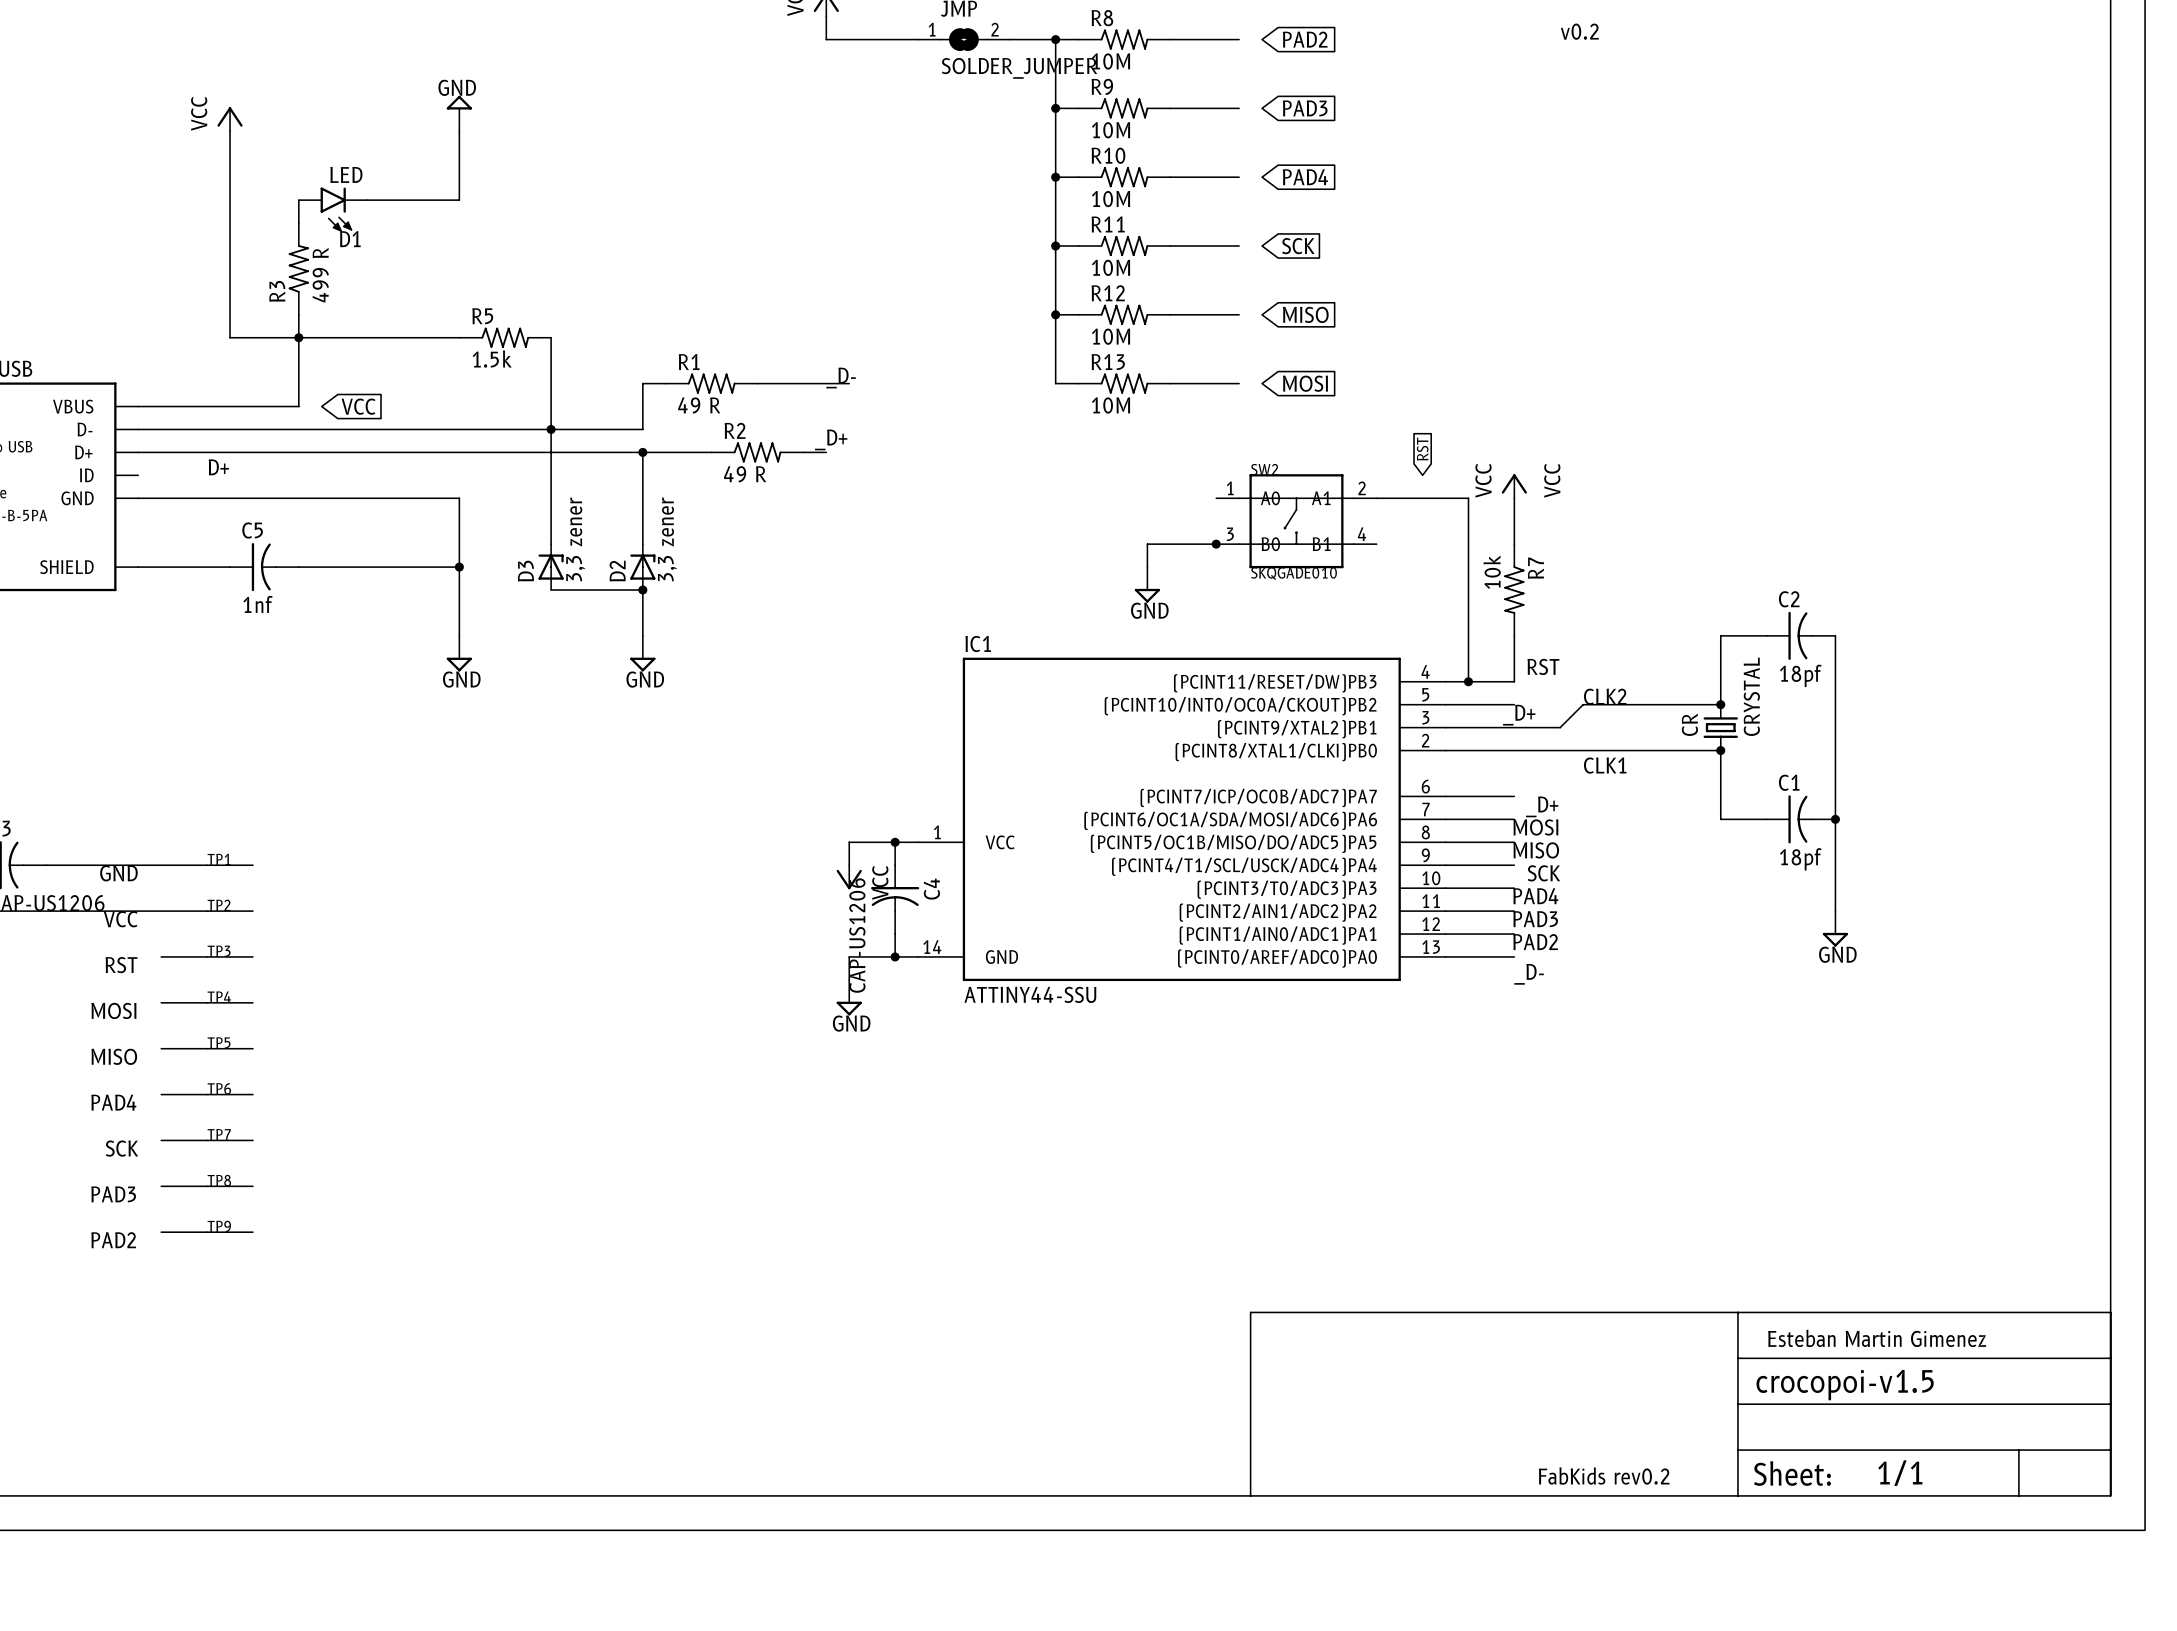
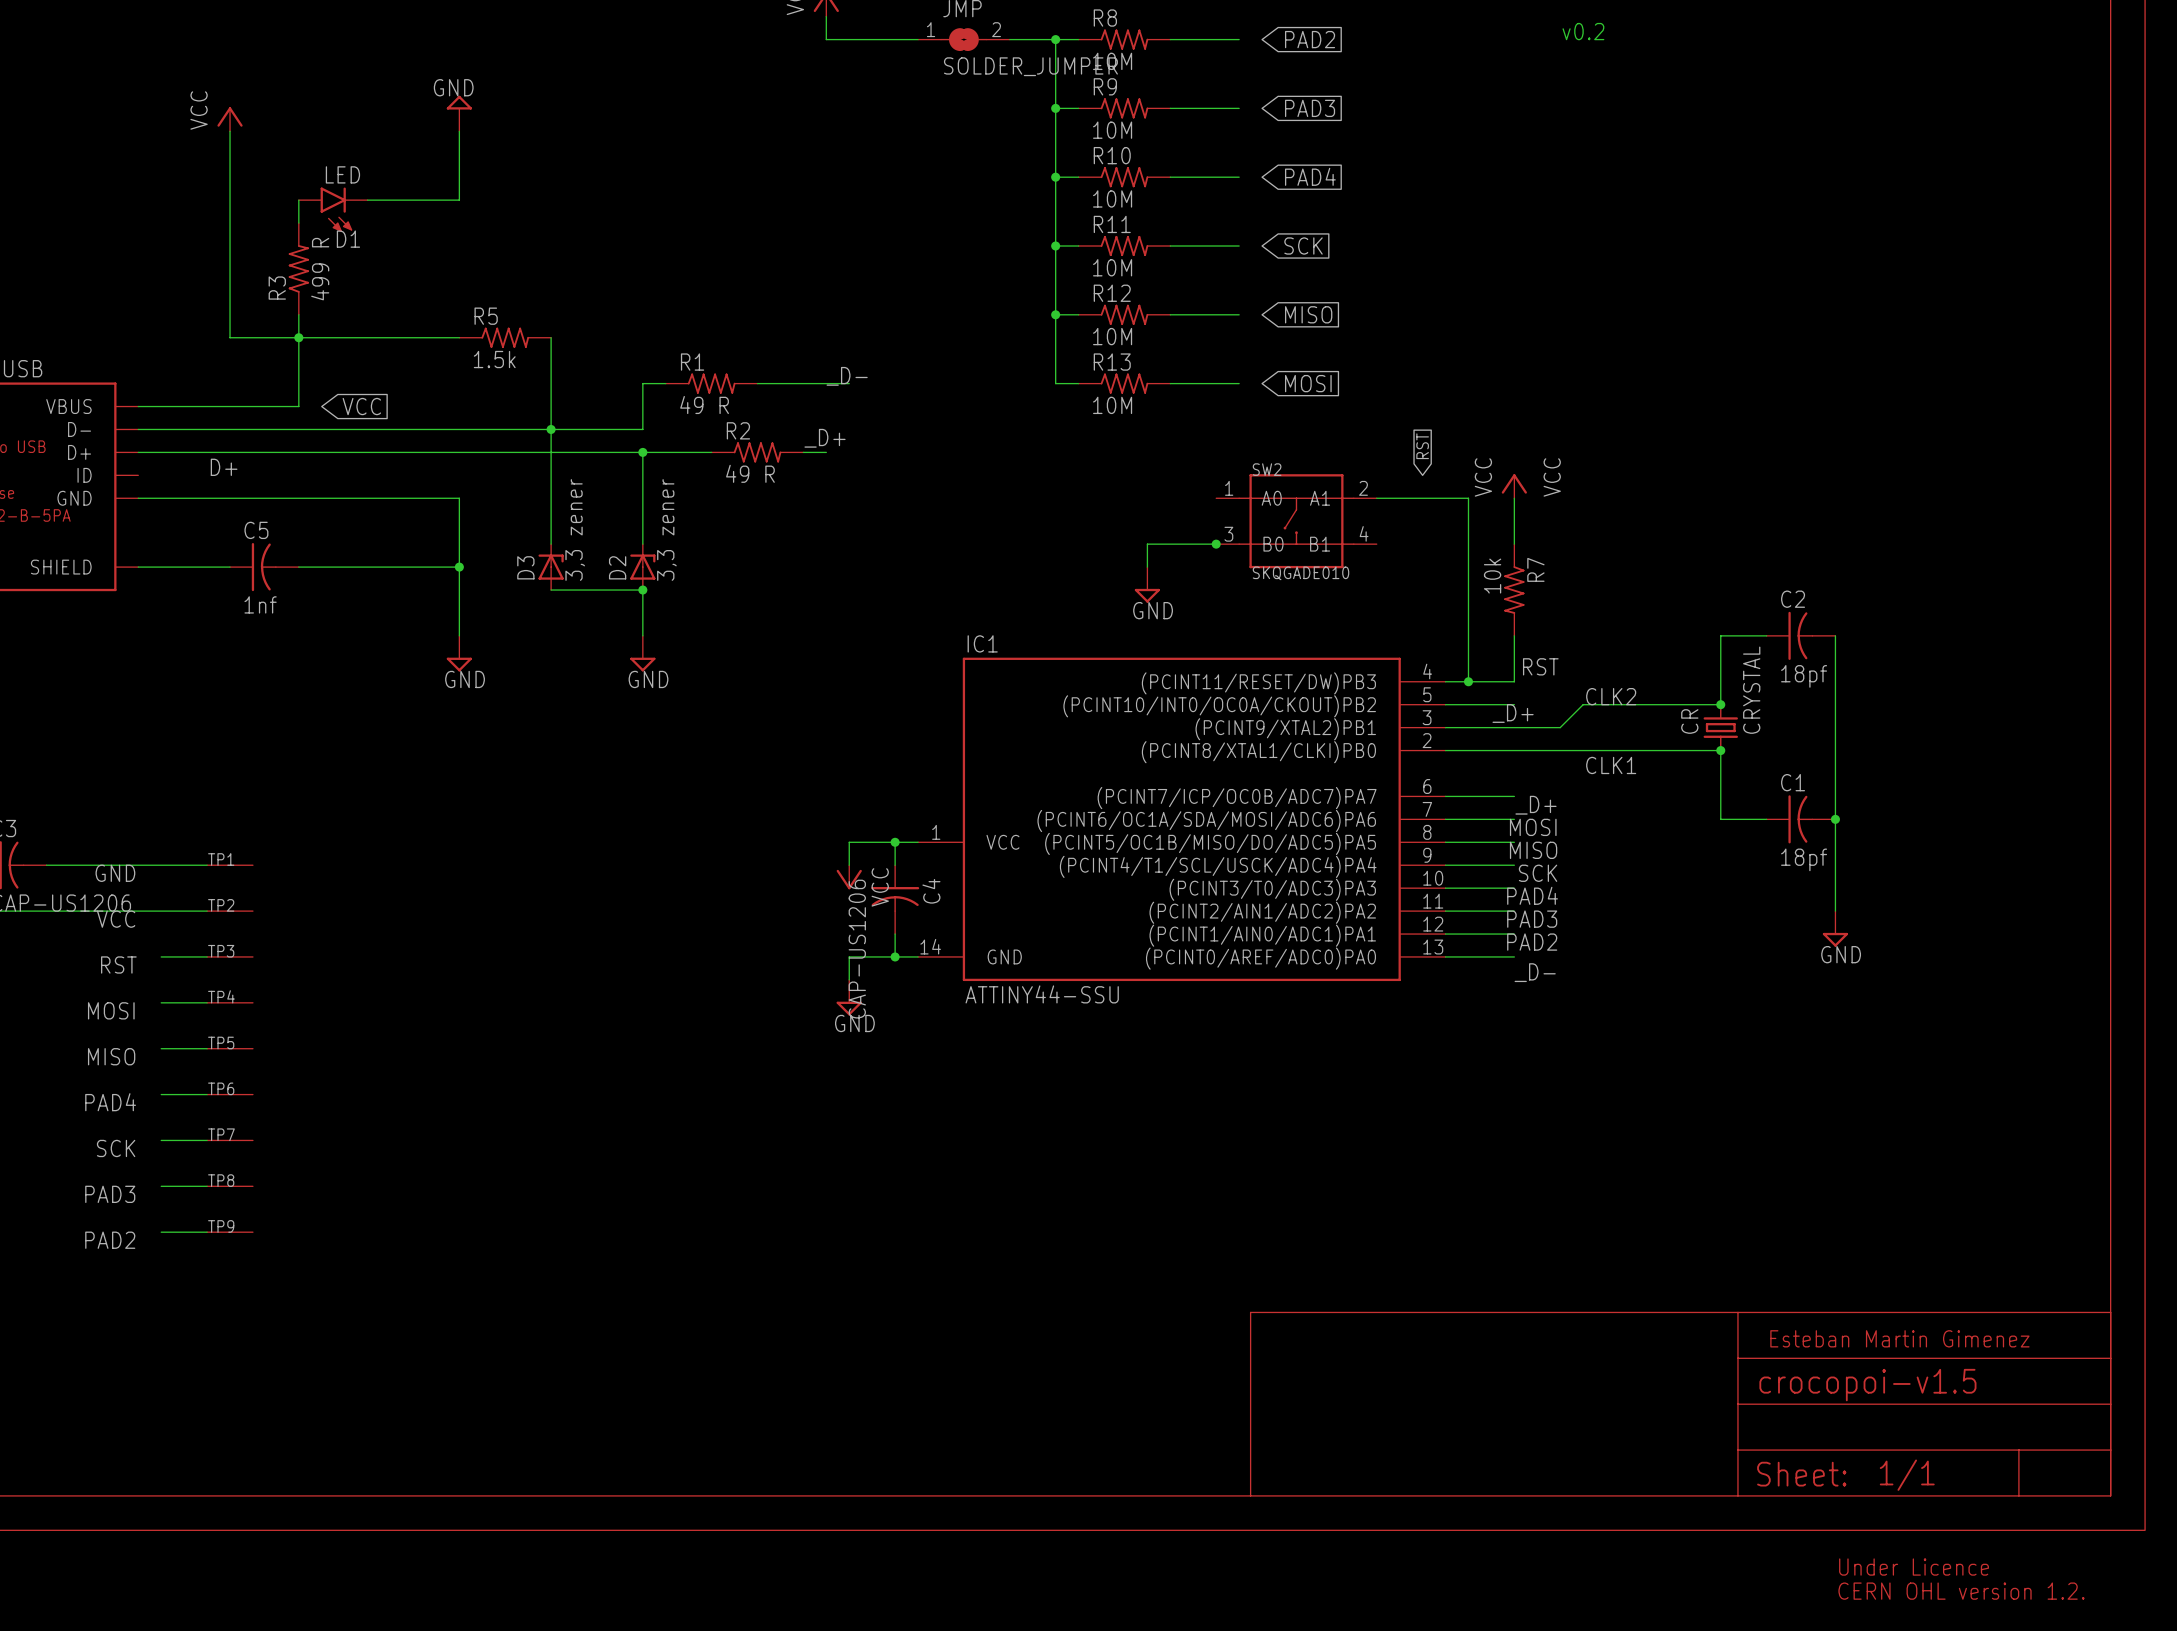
text: FabKids rev0.2 (1604, 1476) -> none
text: none -> Under Licence (1914, 1567)
text: none -> CERN OHL version 1.2. (1961, 1591)

